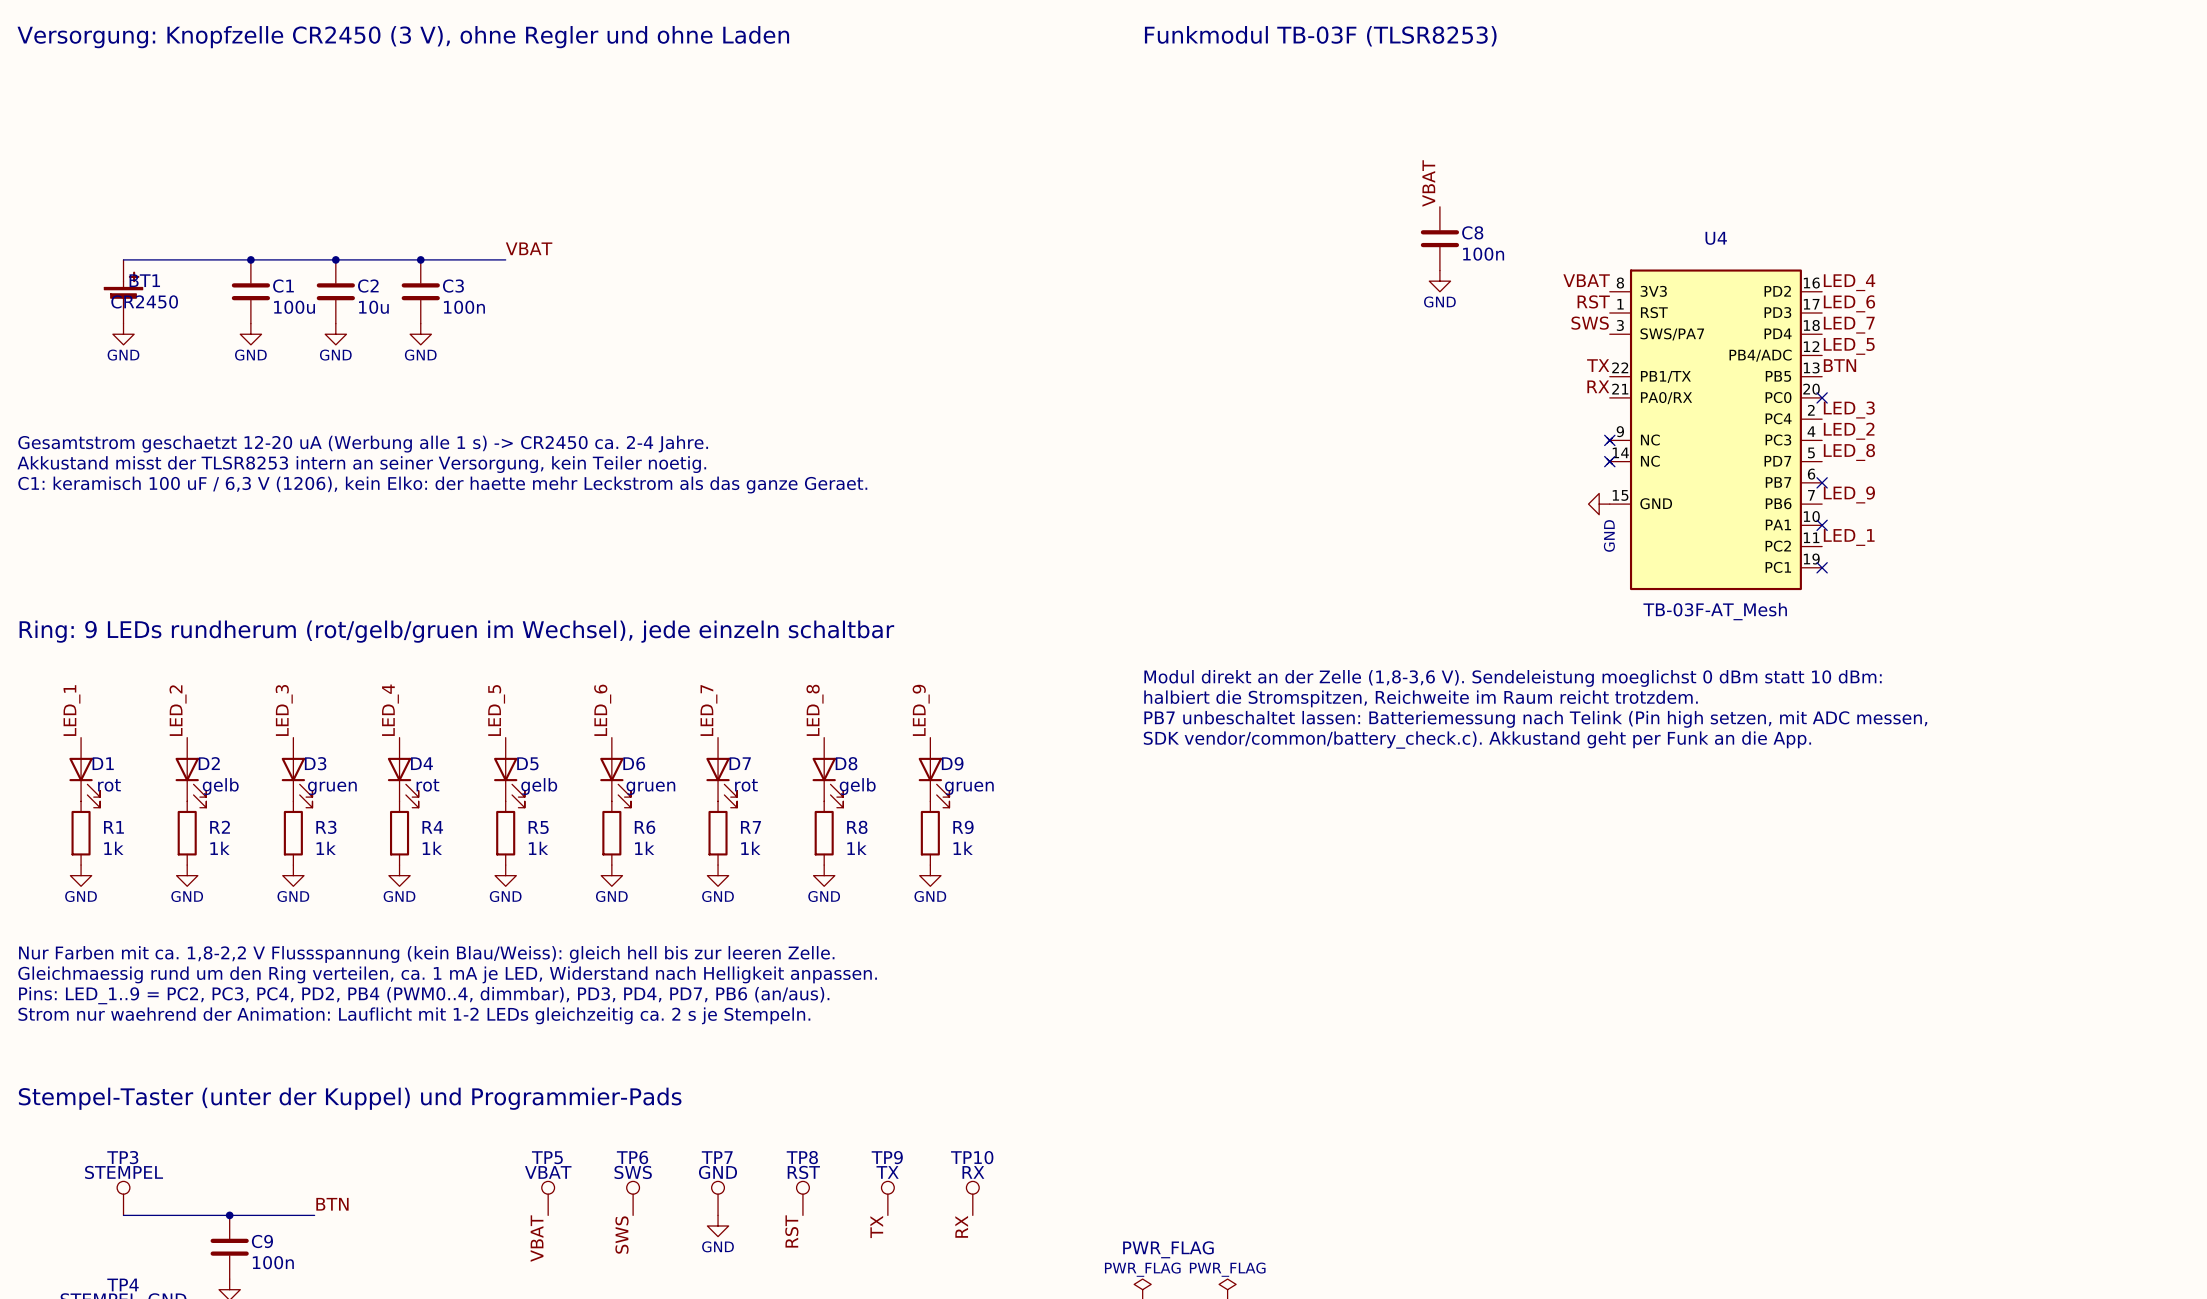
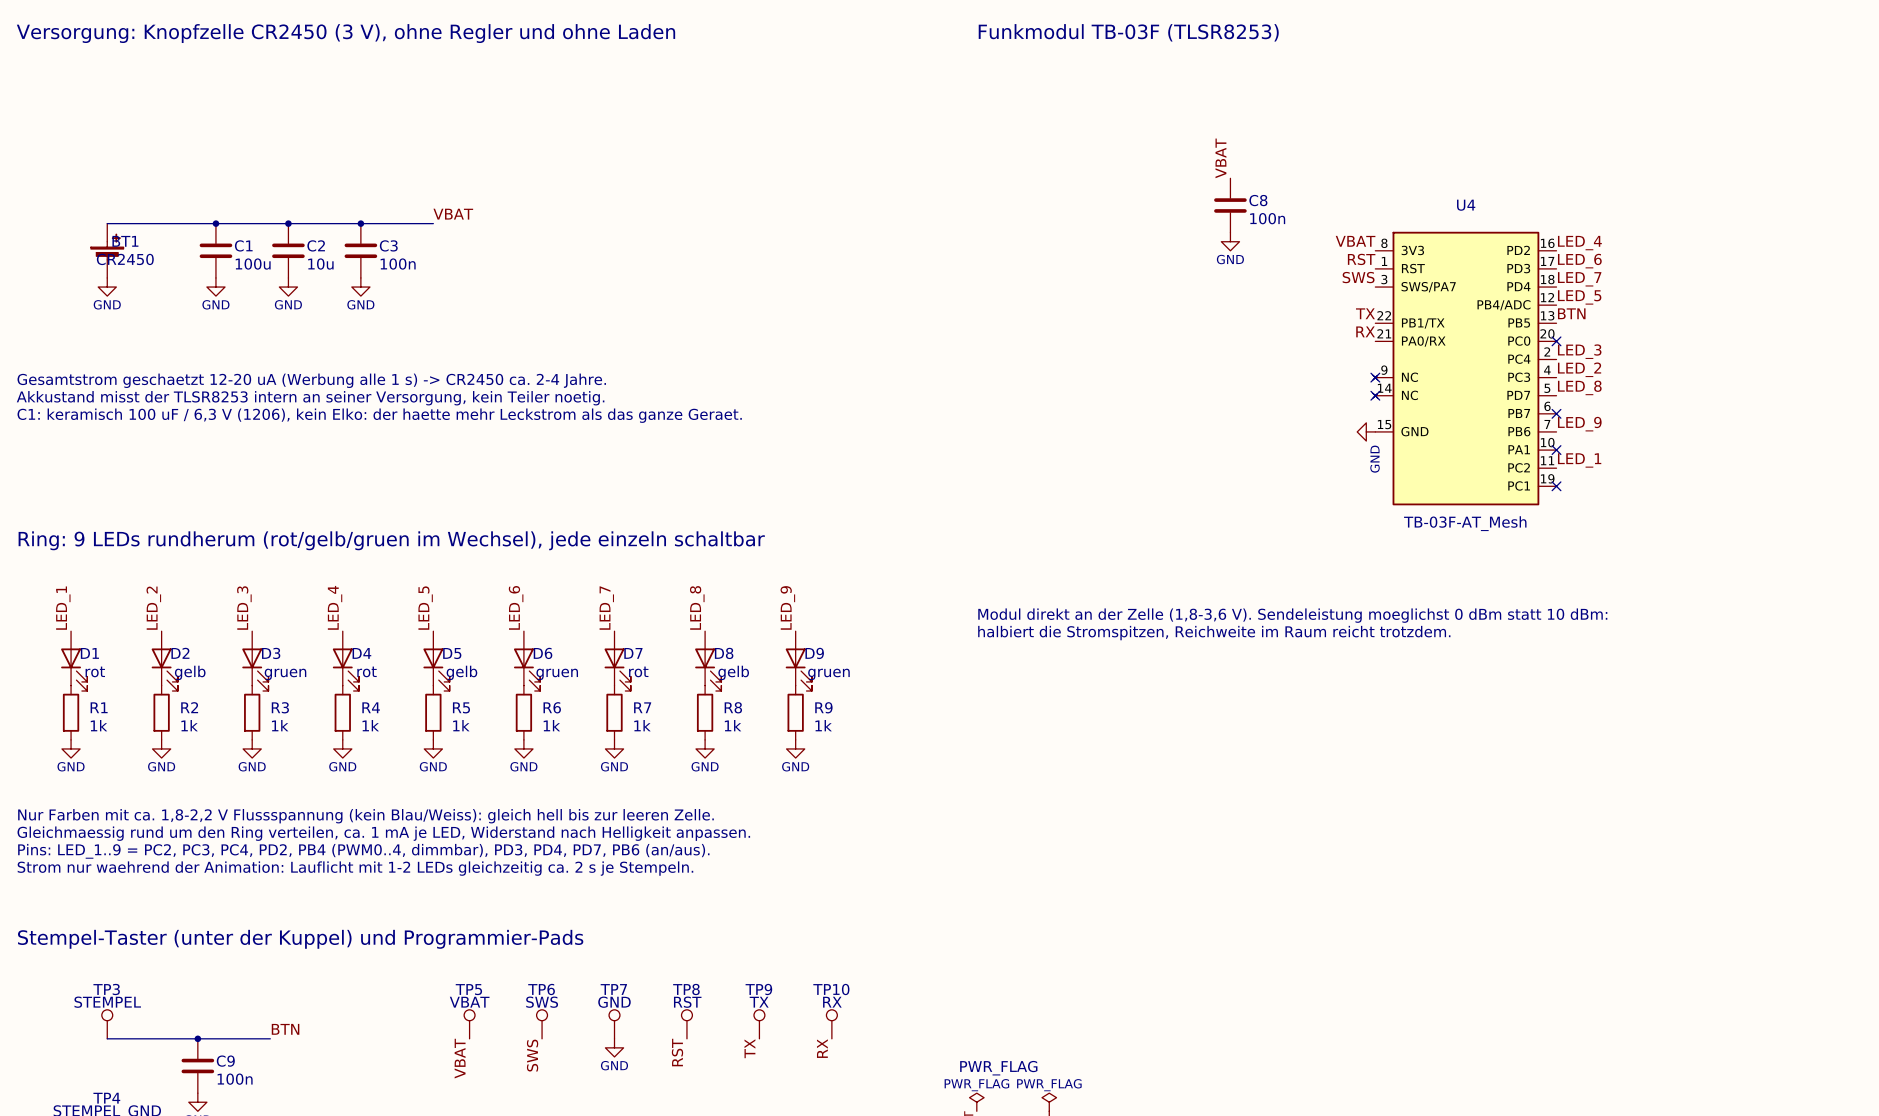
text: Modul direkt an der Zelle (1,8-3,6 V). Sendeleistung moeglichst 0 dBm statt 10 dBm: (1513, 678) -> none
text: halbiert die Stromspitzen, Reichweite im Raum reicht trotzdem. (1421, 698) -> none
text: PB7 unbeschaltet lassen: Batteriemessung nach Telink (Pin high setzen, mit ADC messen, (1535, 719) -> Modul direkt an der Zelle (1,8-3,6 V). Sendeleistung moeglichst 0 dBm statt 10 dBm: (1292, 615)
text: SDK vendor/common/battery_check.c). Akkustand geht per Funk an die App. (1477, 740) -> halbiert die Stromspitzen, Reichweite im Raum reicht trotzdem. (1214, 633)

